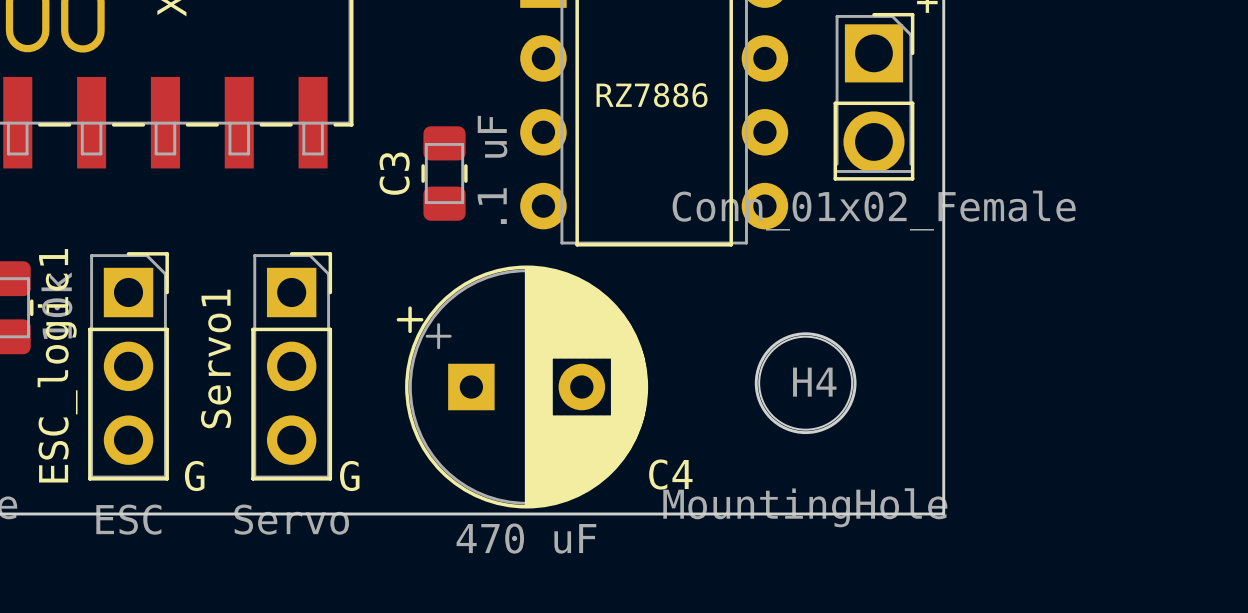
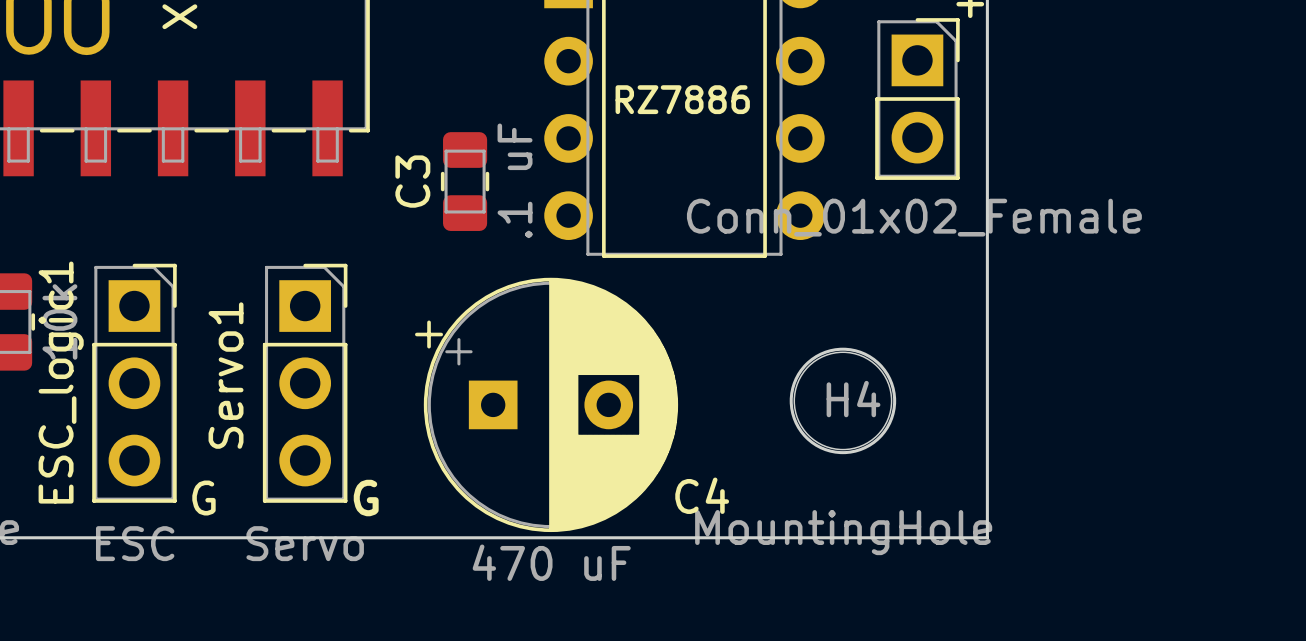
part footprint: [833, 12, 915, 181] -> [875, 18, 960, 180]

